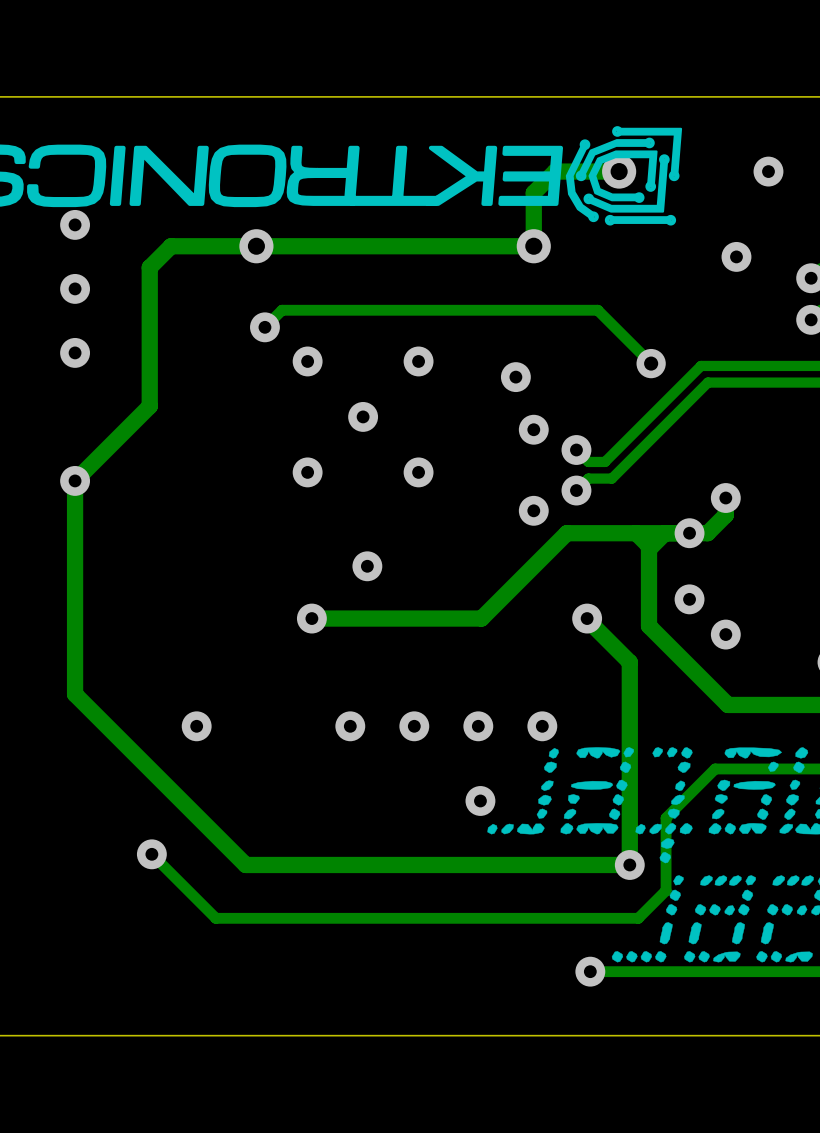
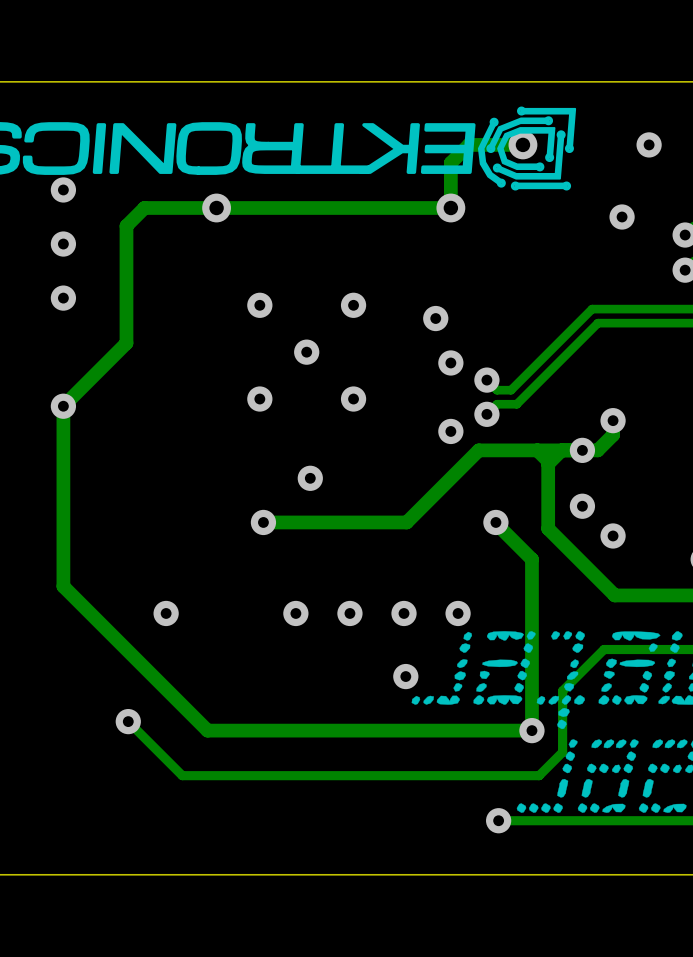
track: (264, 327) (282, 310) (597, 310) (651, 363) -> none
via: (264, 327) -> none
via: (651, 363) -> none

